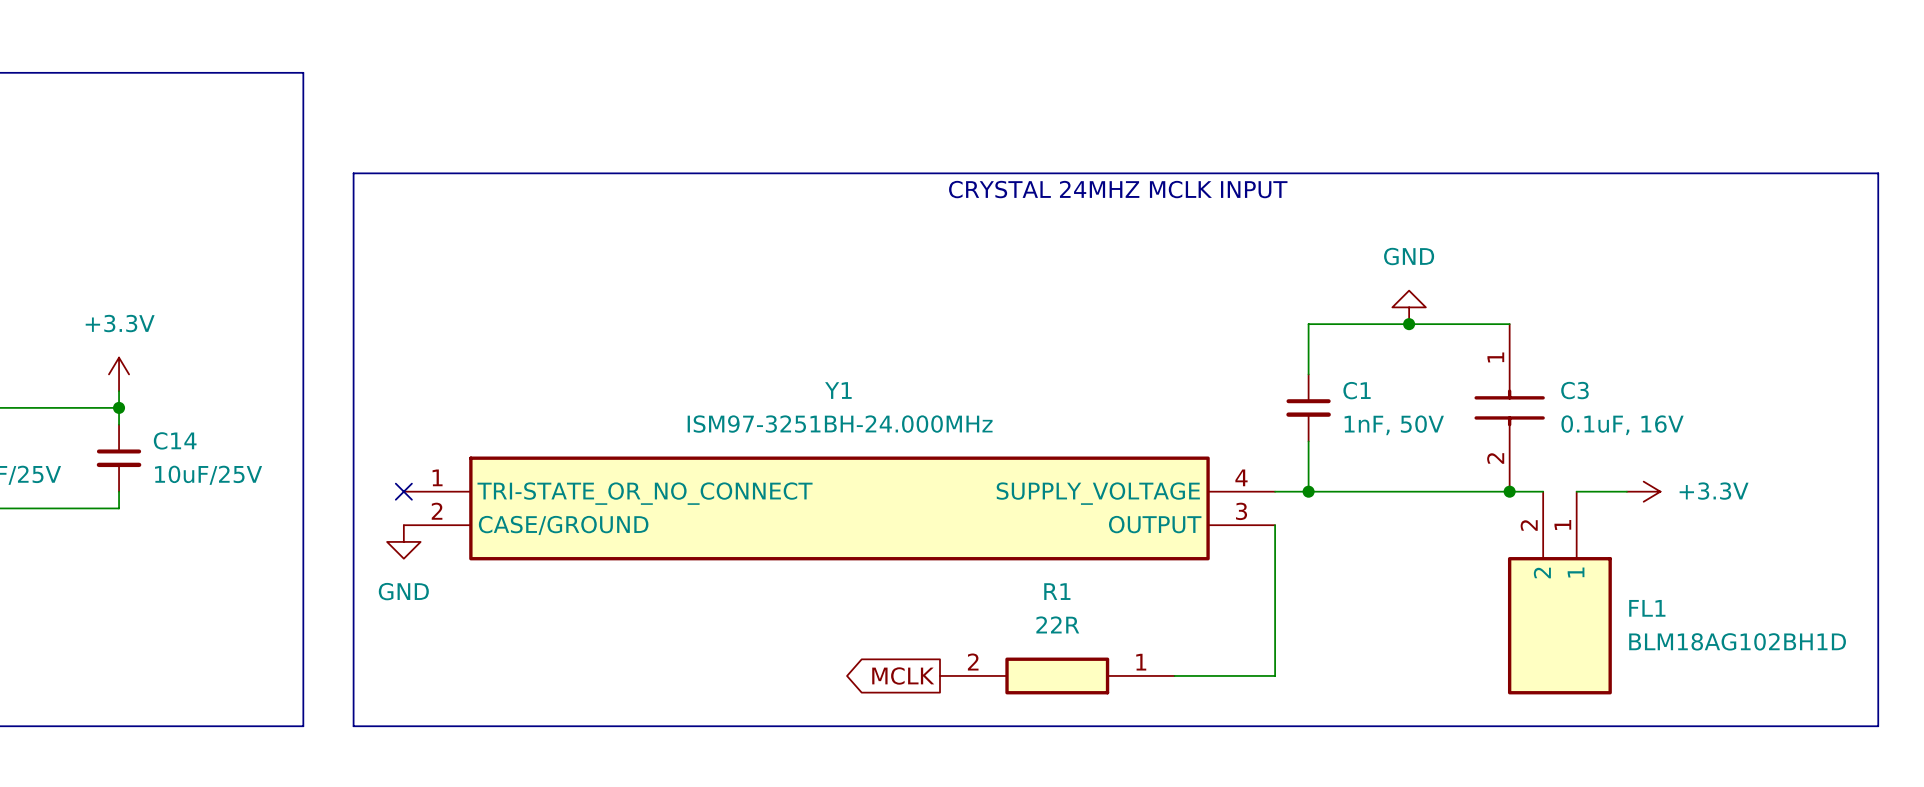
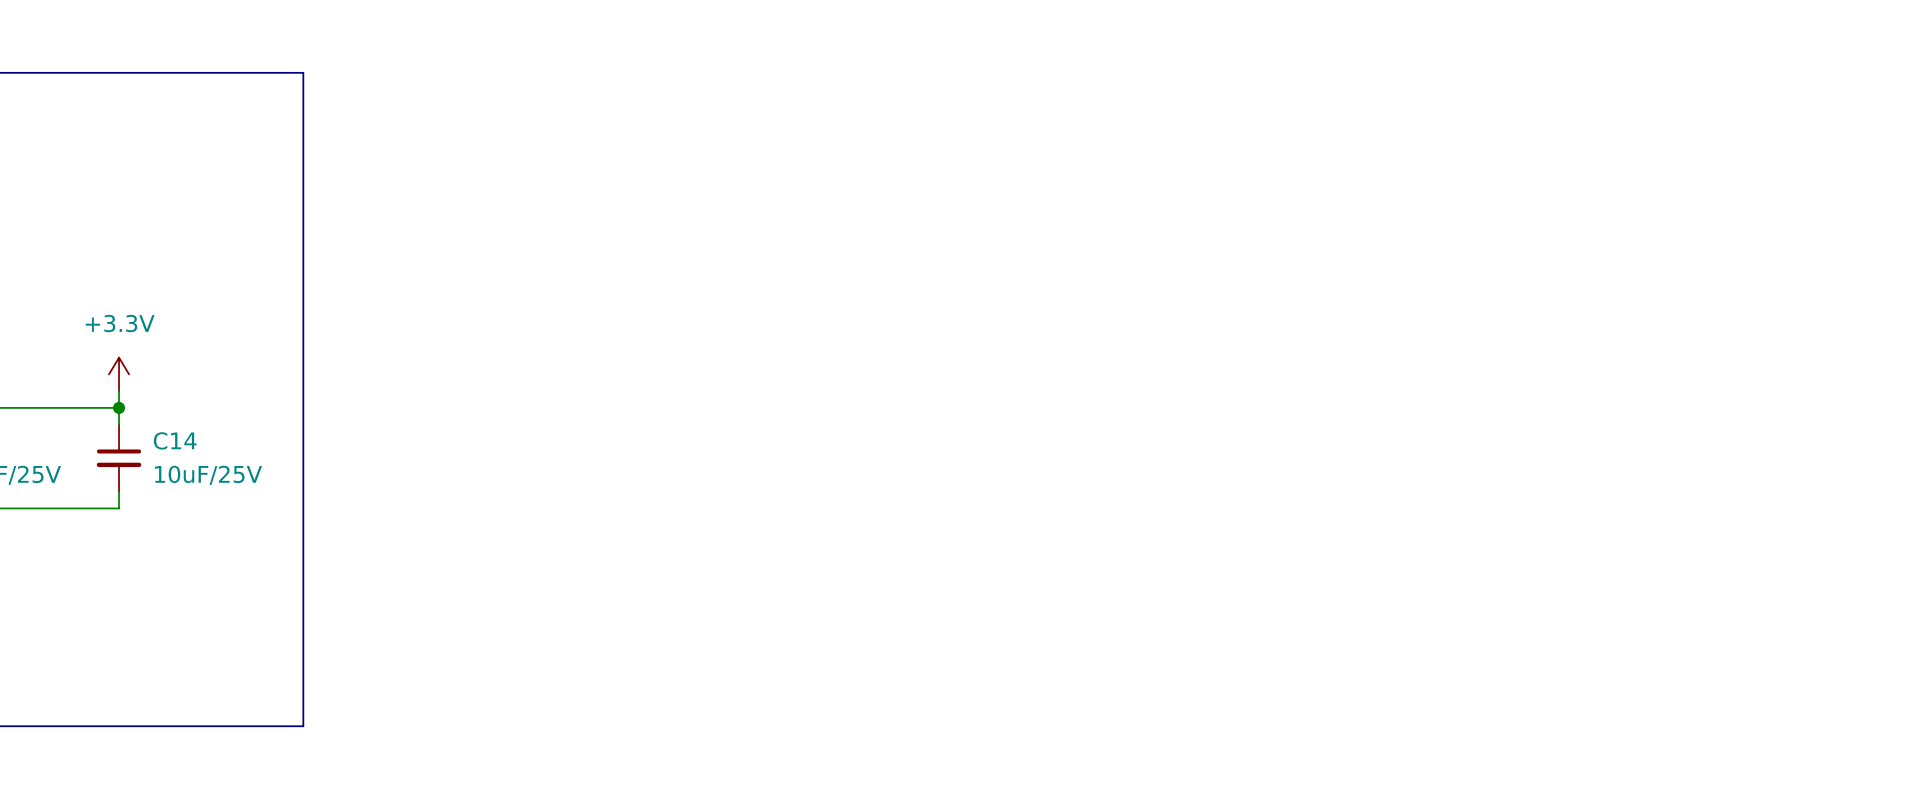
line: (353, 173) (1878, 173) (1878, 726) (353, 726) (353, 173) -> none
text: CRYSTAL 24MHZ MCLK INPUT (1118, 189) -> none
power symbol: GND (1409, 307) -> none
junction: (1409, 324) -> none
wire: (1509, 324) (1308, 324) (1308, 374) -> none
C1: (1308, 407) -> none
C3: 0.1uF, 16V (1509, 407) -> none
wire: (1308, 441) (1308, 491) -> none
no-connect mark: (403, 491) -> none
wire: (1275, 491) (1543, 491) -> none
junction: (1308, 491) -> none
junction: (1509, 491) -> none
wire: (1576, 491) (1626, 491) -> none
power symbol: +3.3V (1643, 491) -> none
Y1: ISM97-3251BH-24.000MHz (839, 508) -> none
wire: (1275, 525) (1275, 675) (1174, 675) -> none
power symbol: GND (403, 541) -> none
FL1: BLM18AG102BH1D (1559, 593) -> none
global label: MCLK (903, 675) -> none
R1: 22R (1057, 675) -> none

